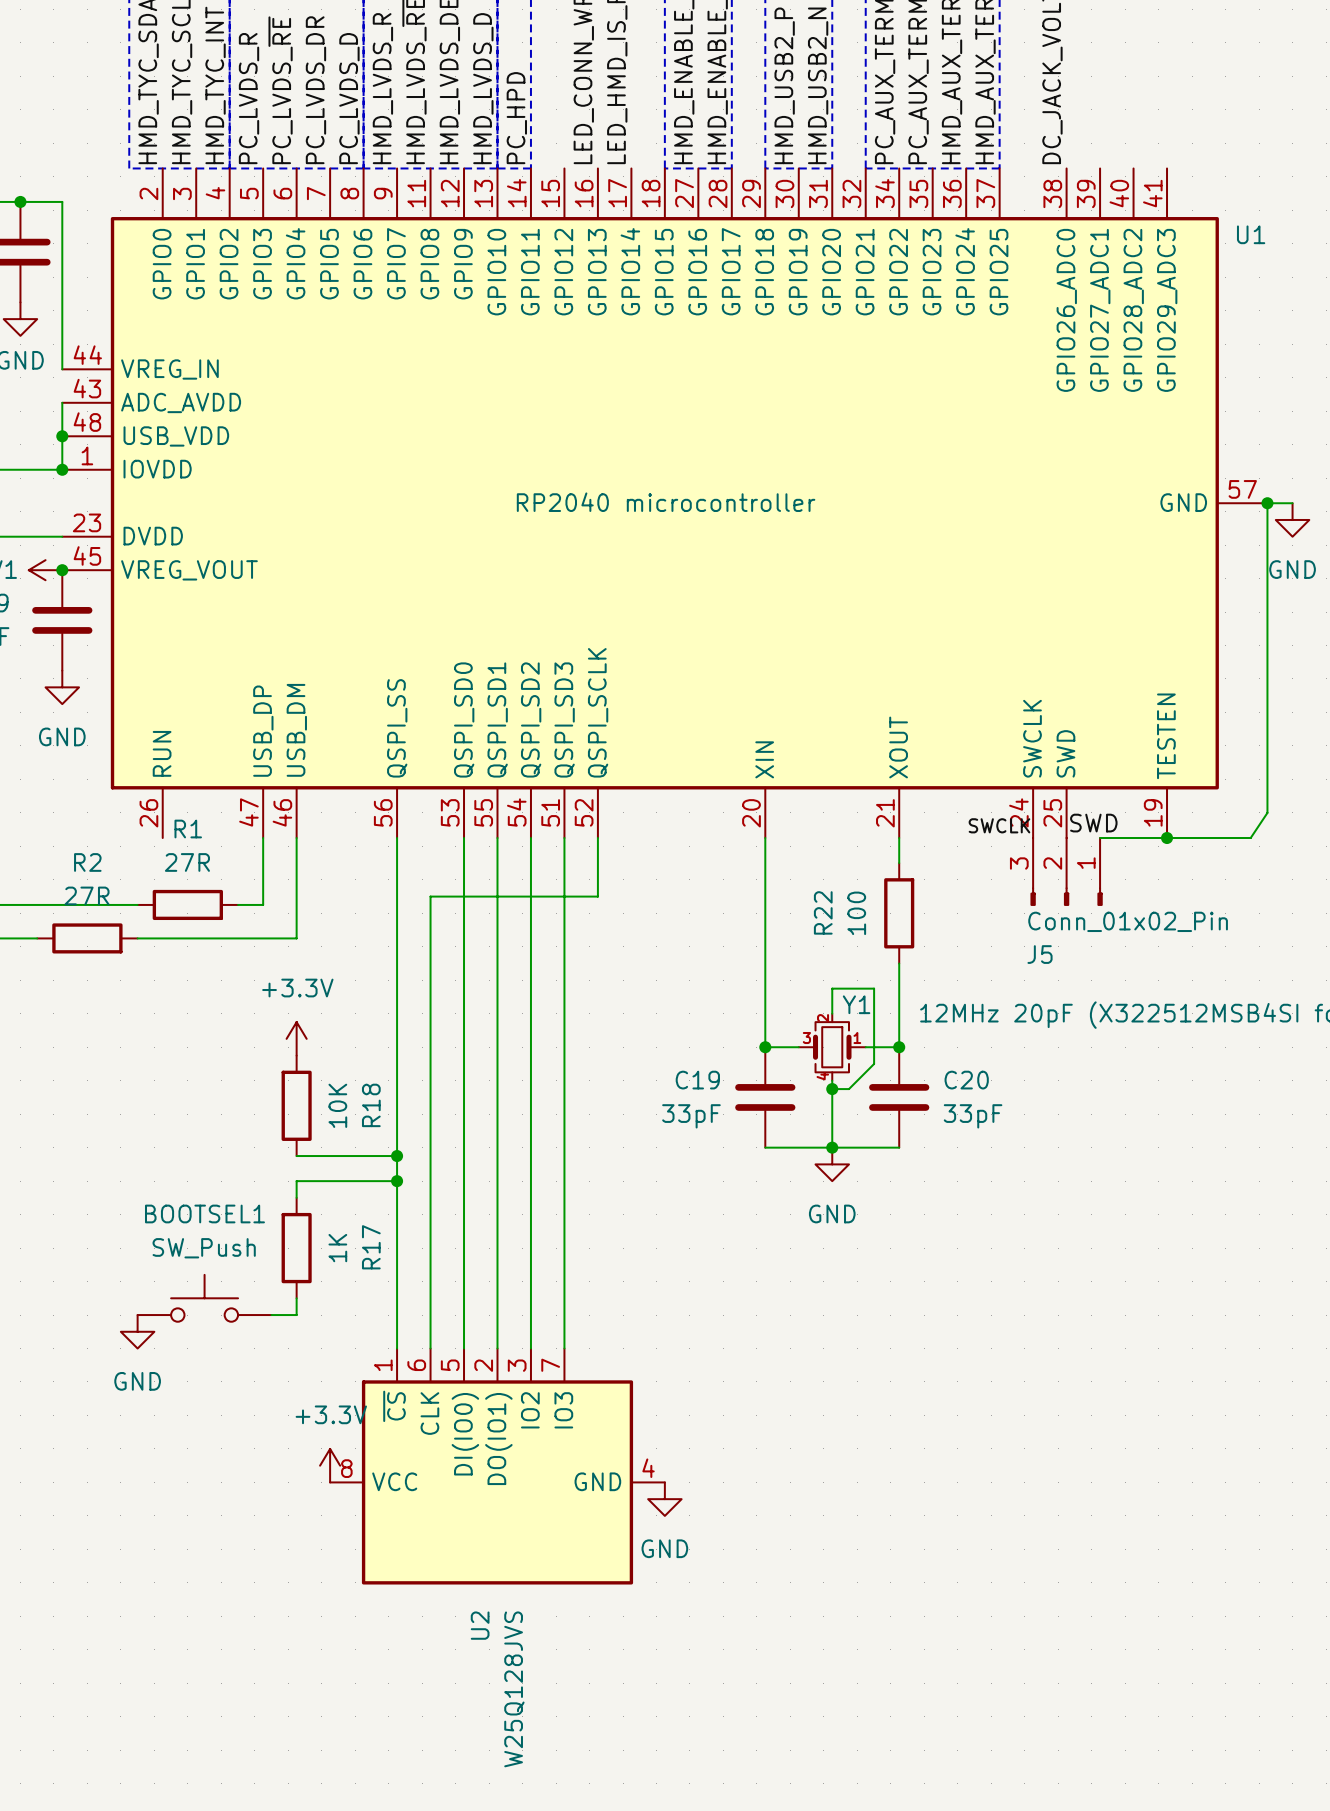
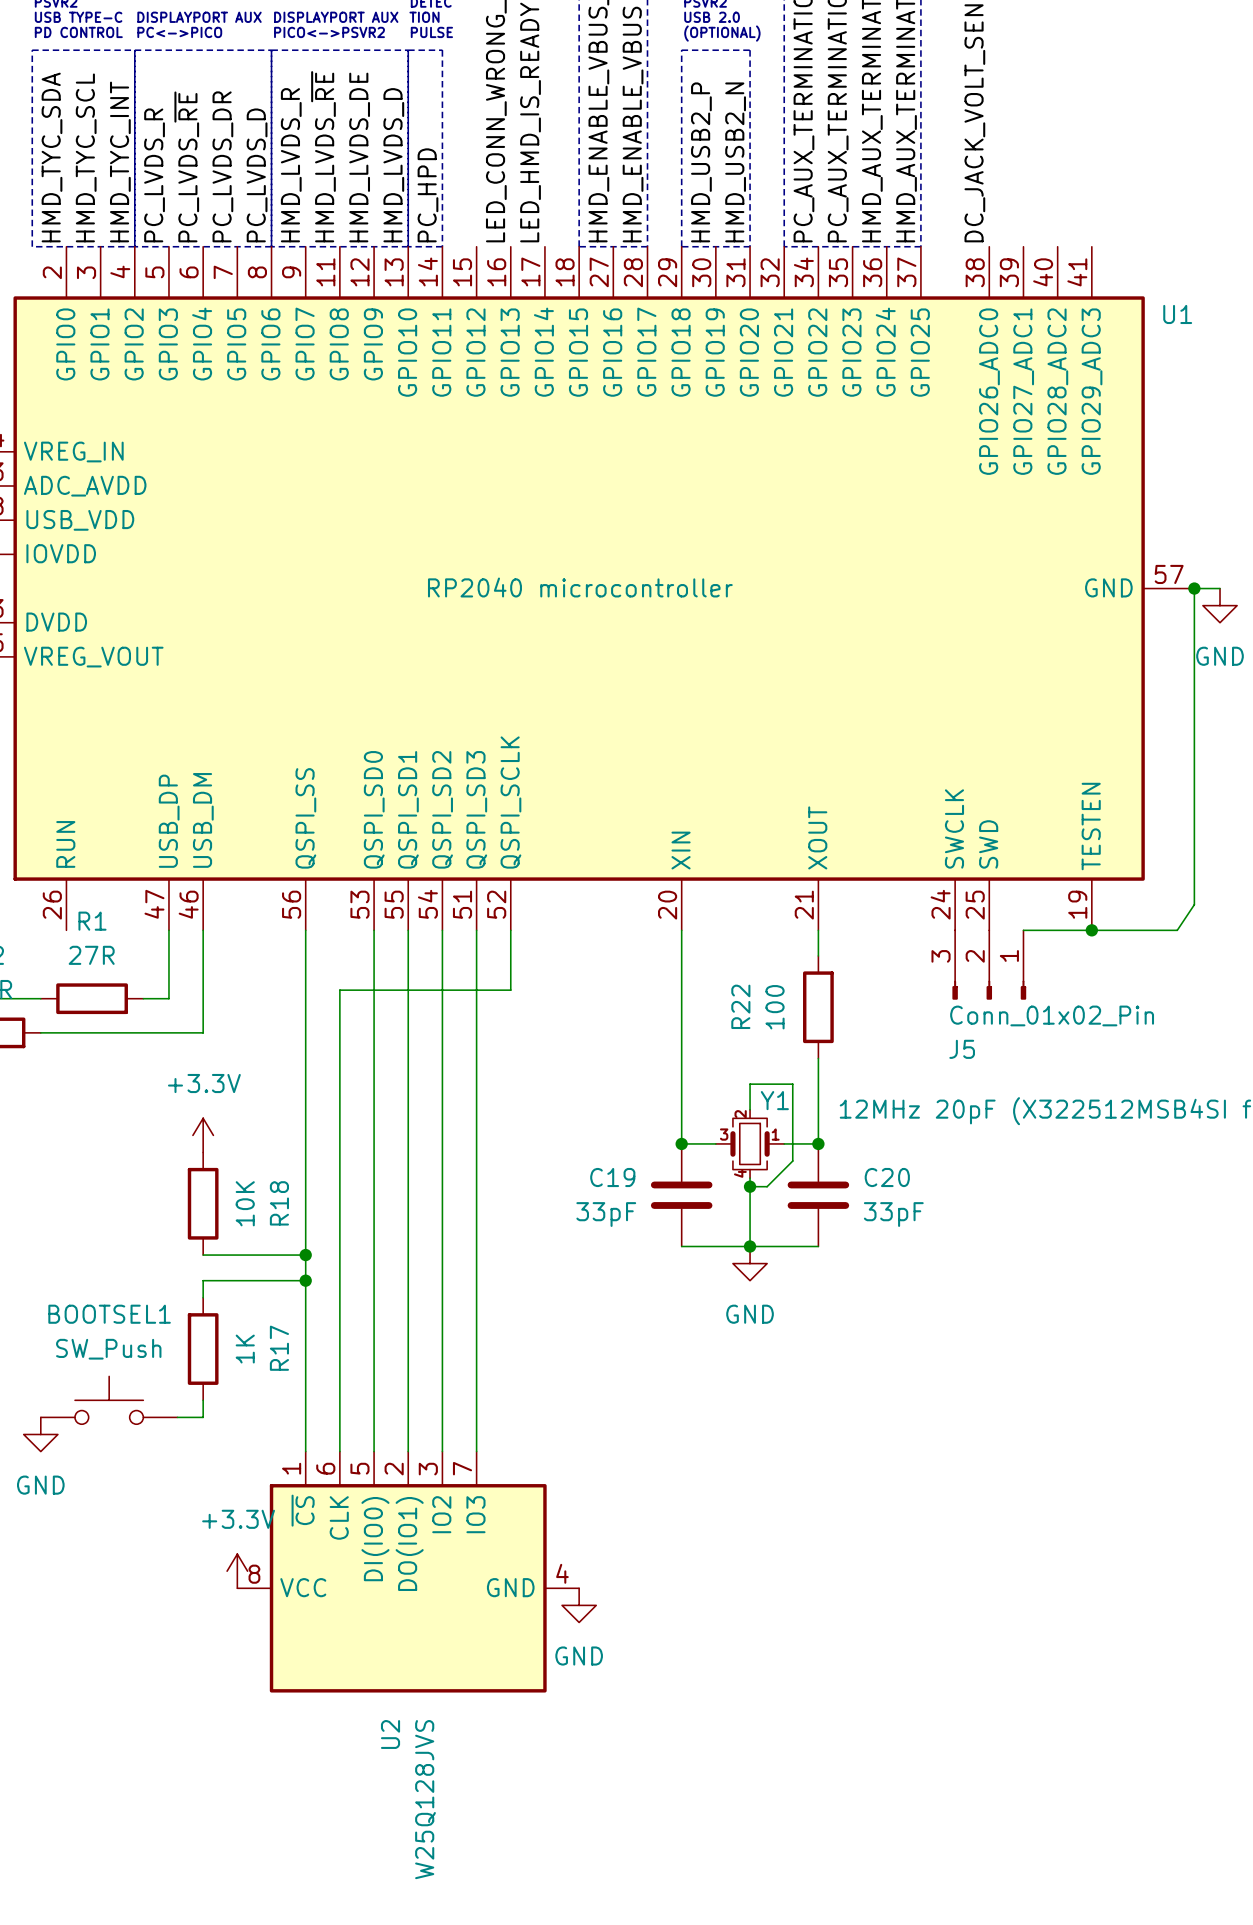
label: SWD (1093, 823) -> none
label: SWCLK (999, 825) -> none

